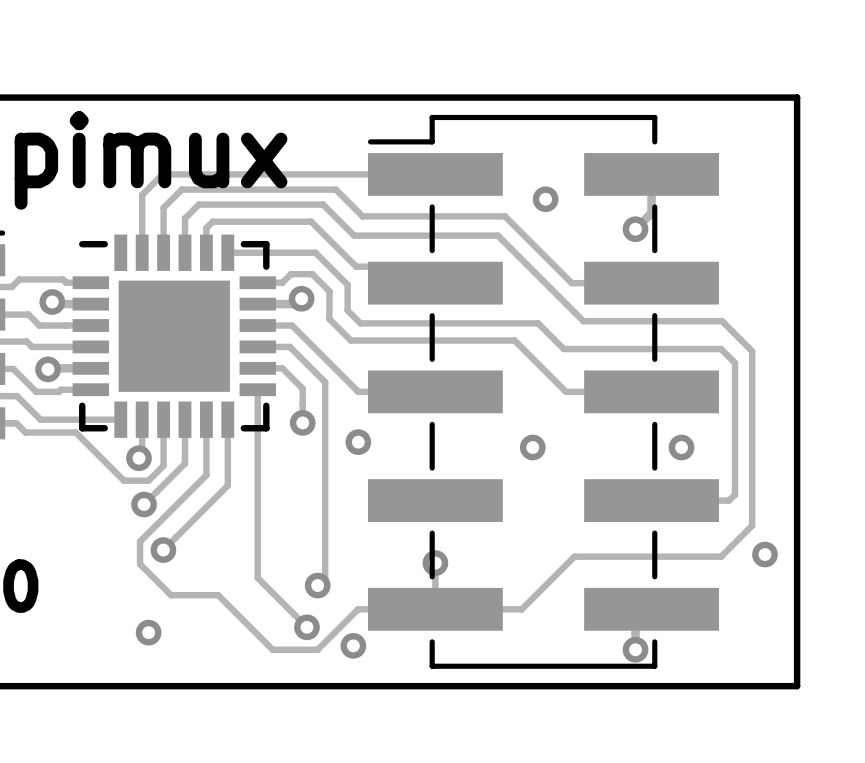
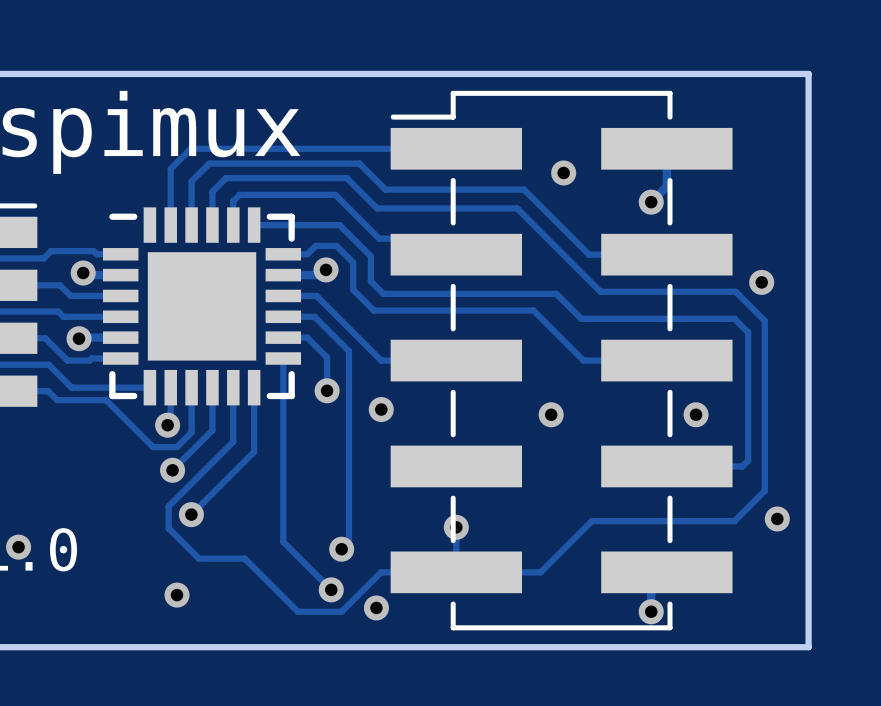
via: none -> (761, 282)

